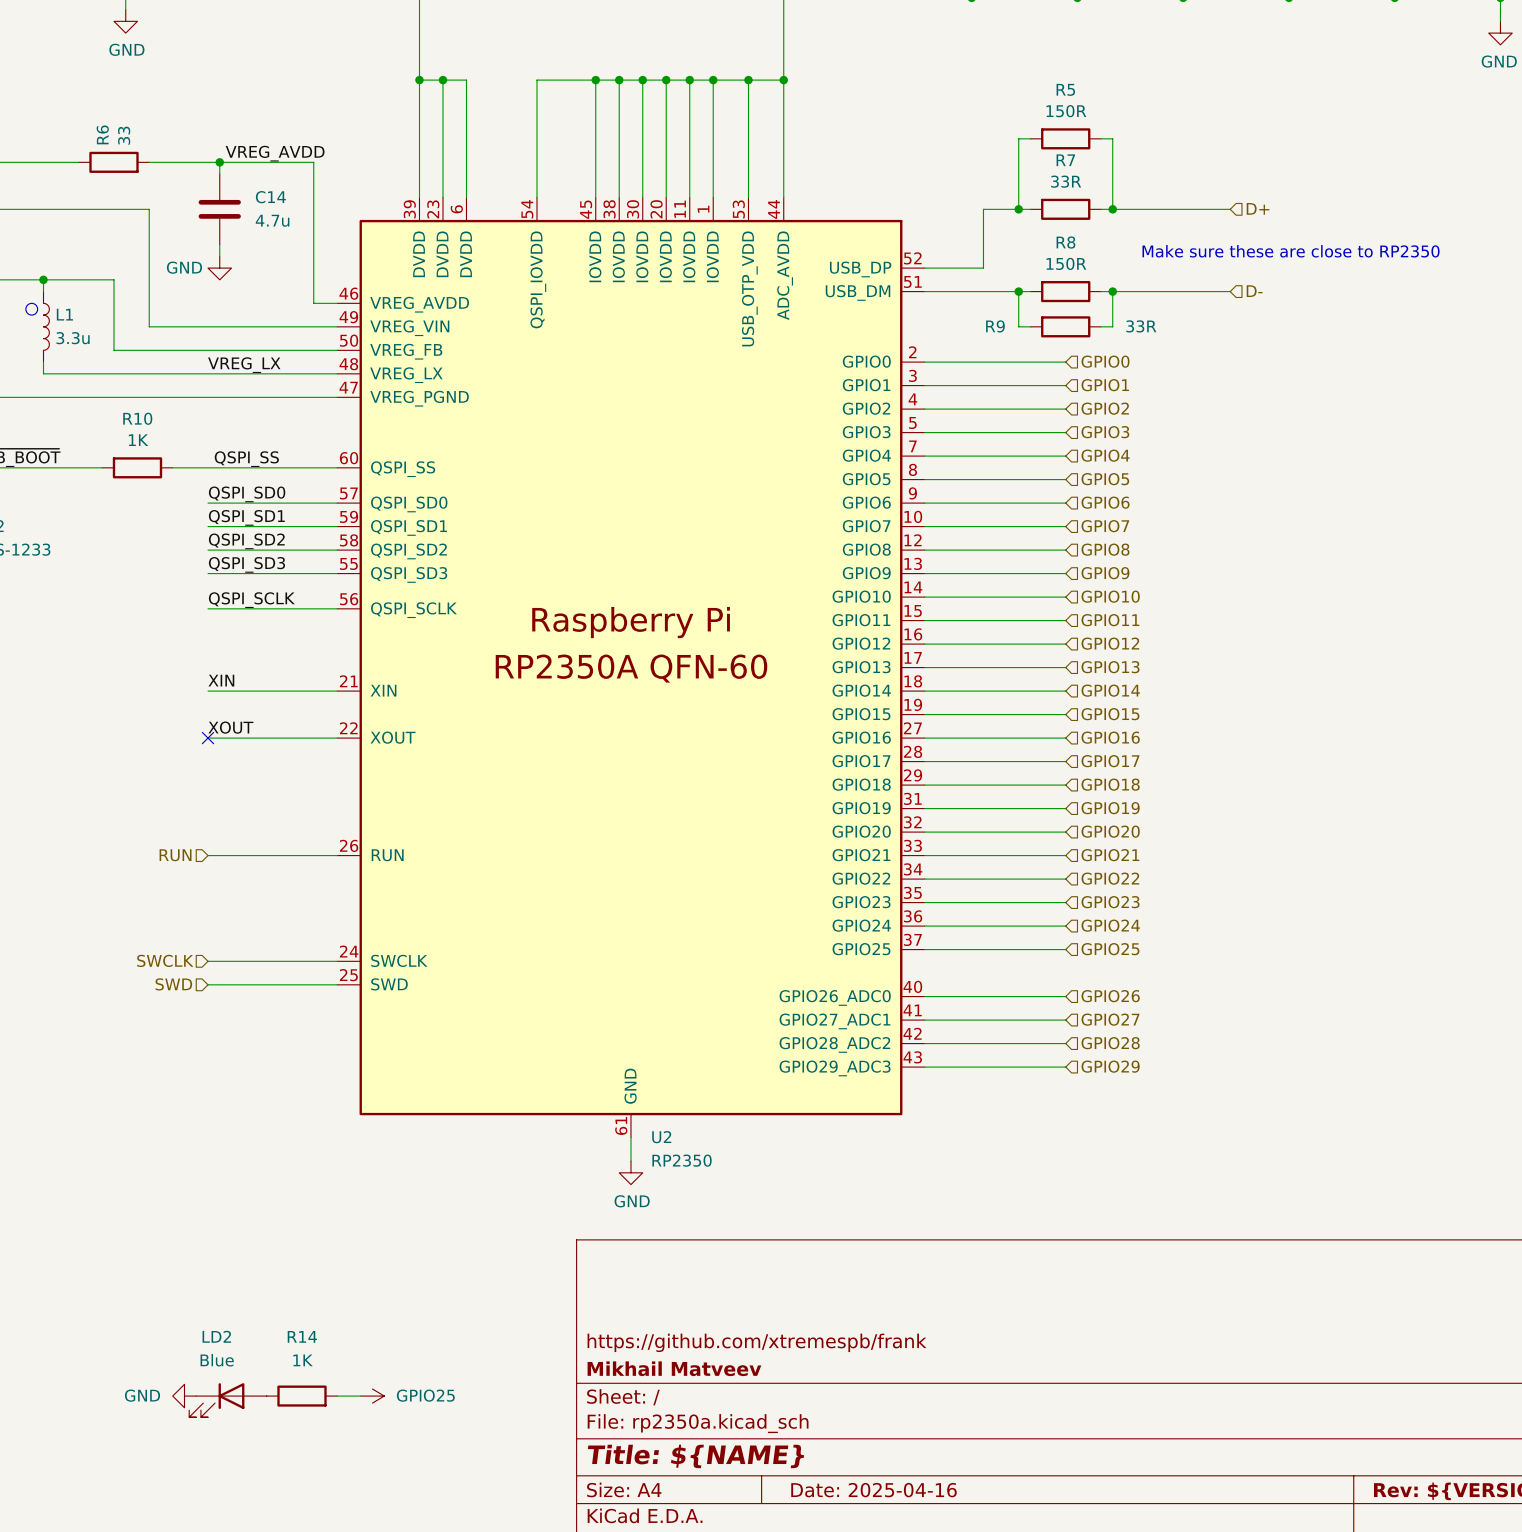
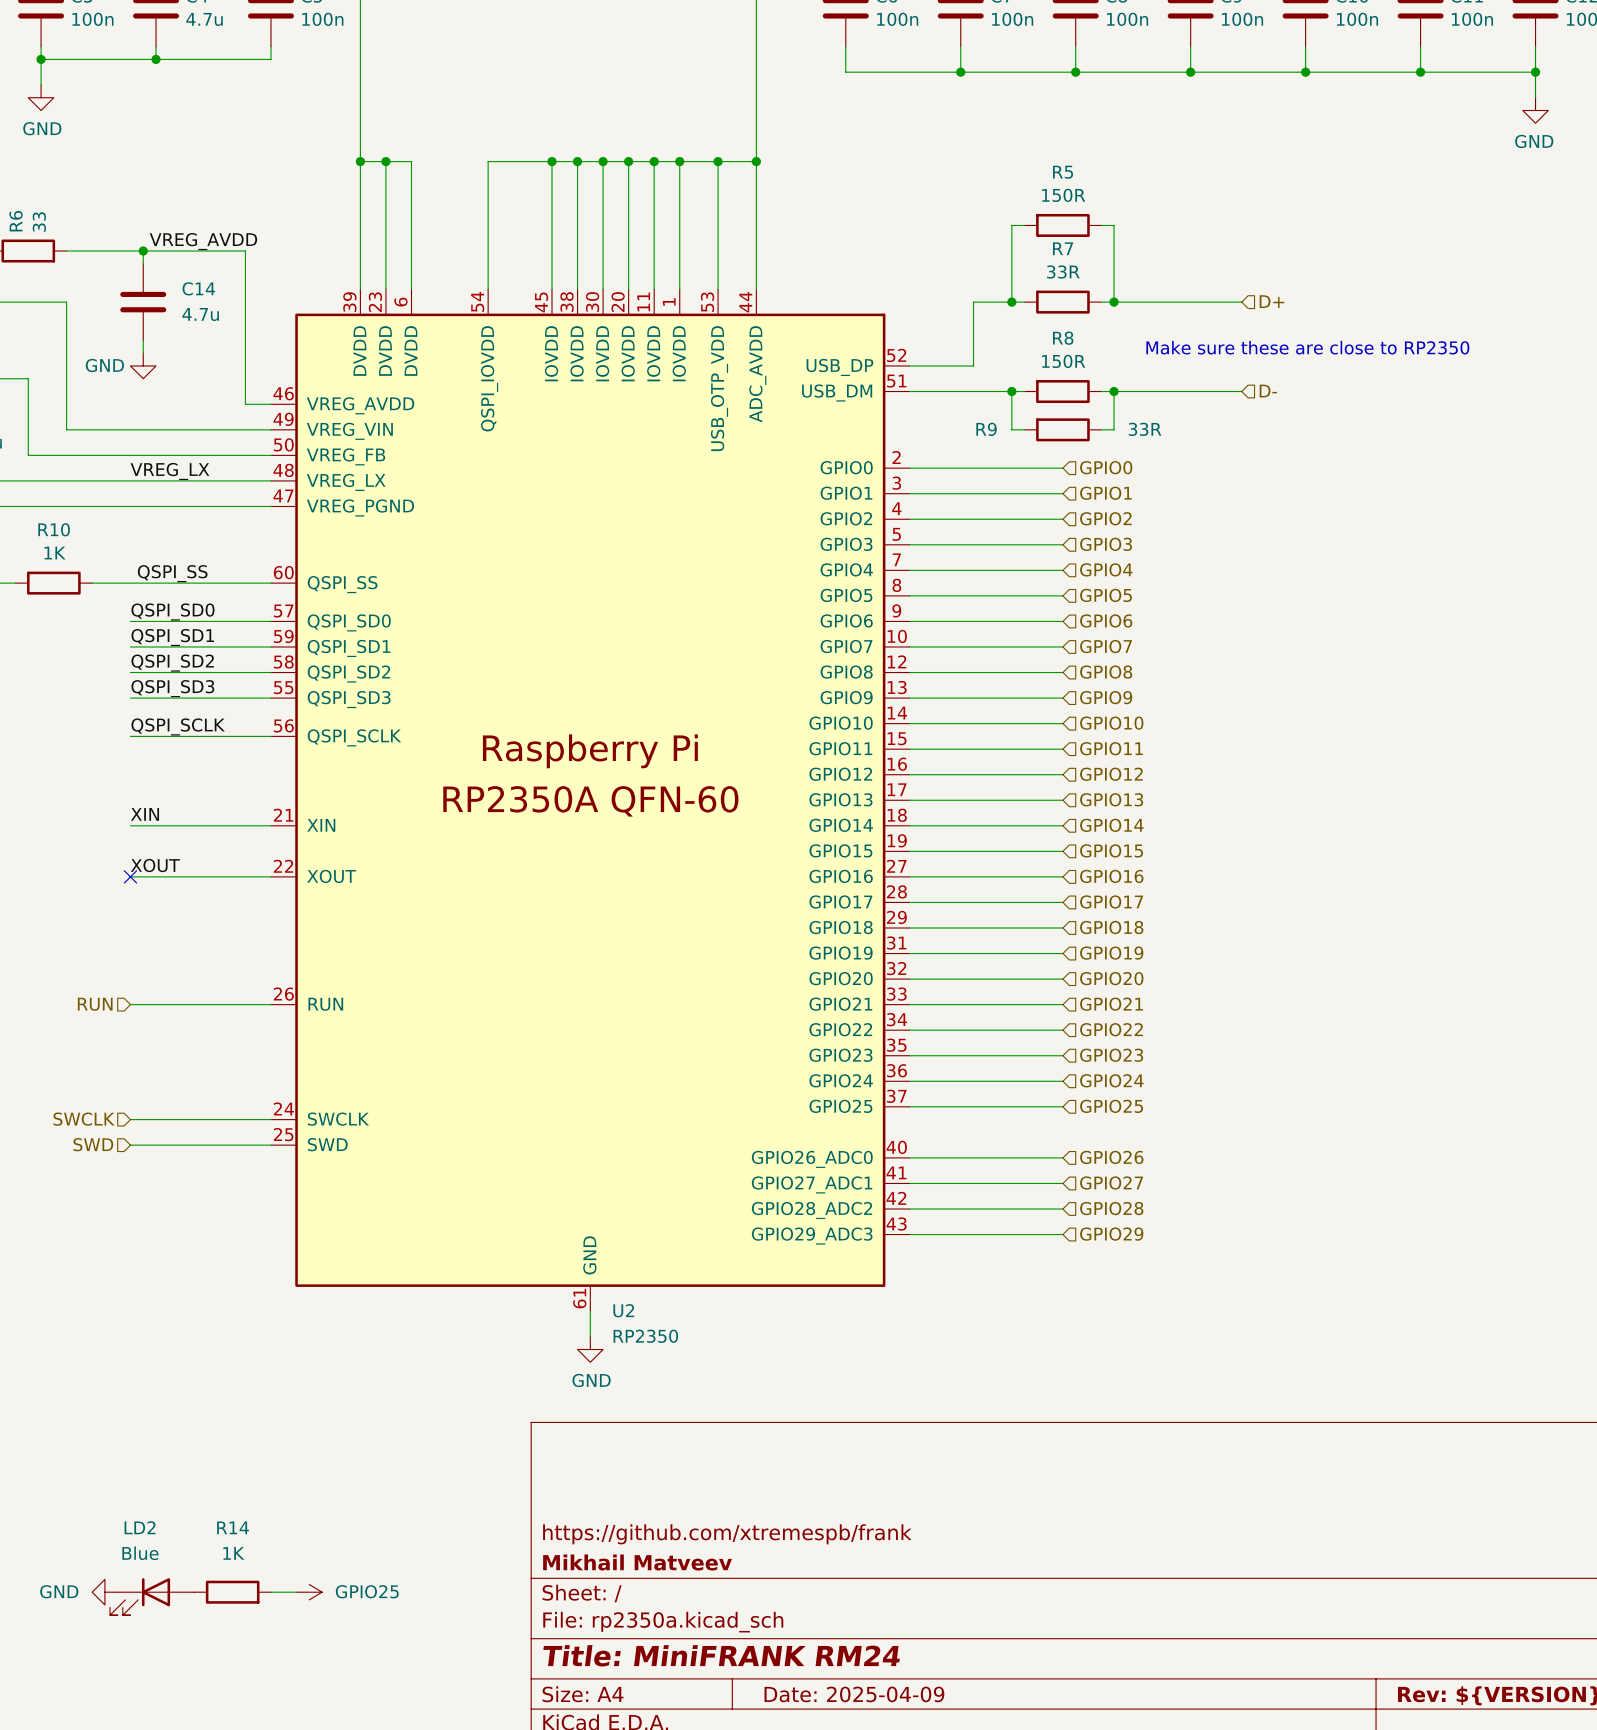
title block: Title: ${NAME} (695, 1456) -> Title: MiniFRANK RM24 (721, 1655)
title block: Date: 2025-04-16 (874, 1490) -> Date: 2025-04-09 (854, 1694)

